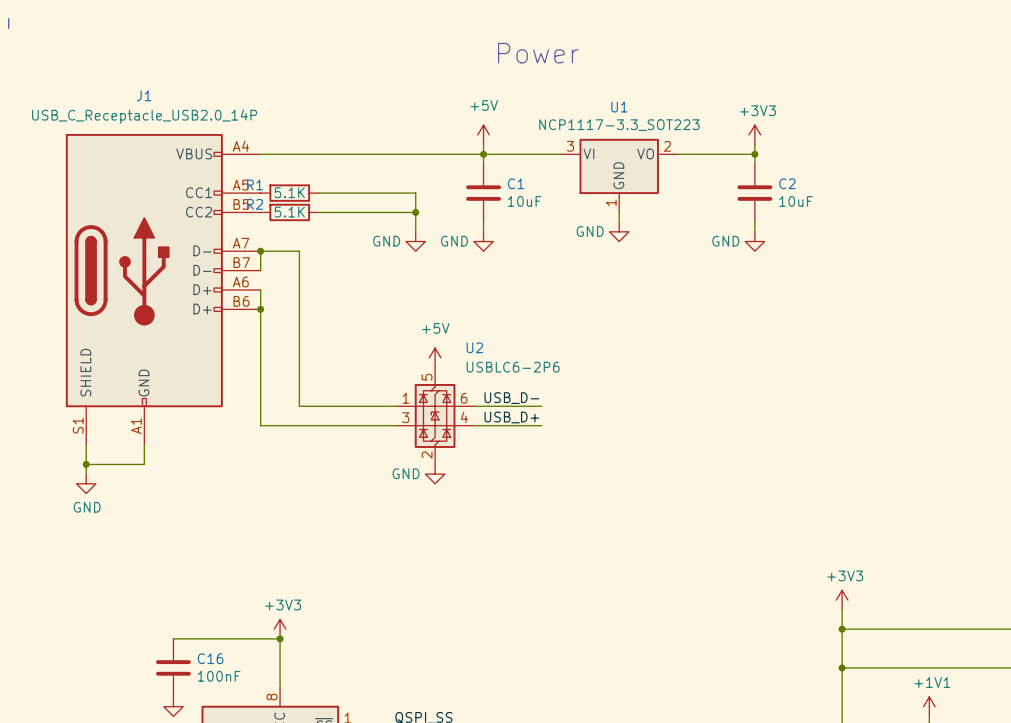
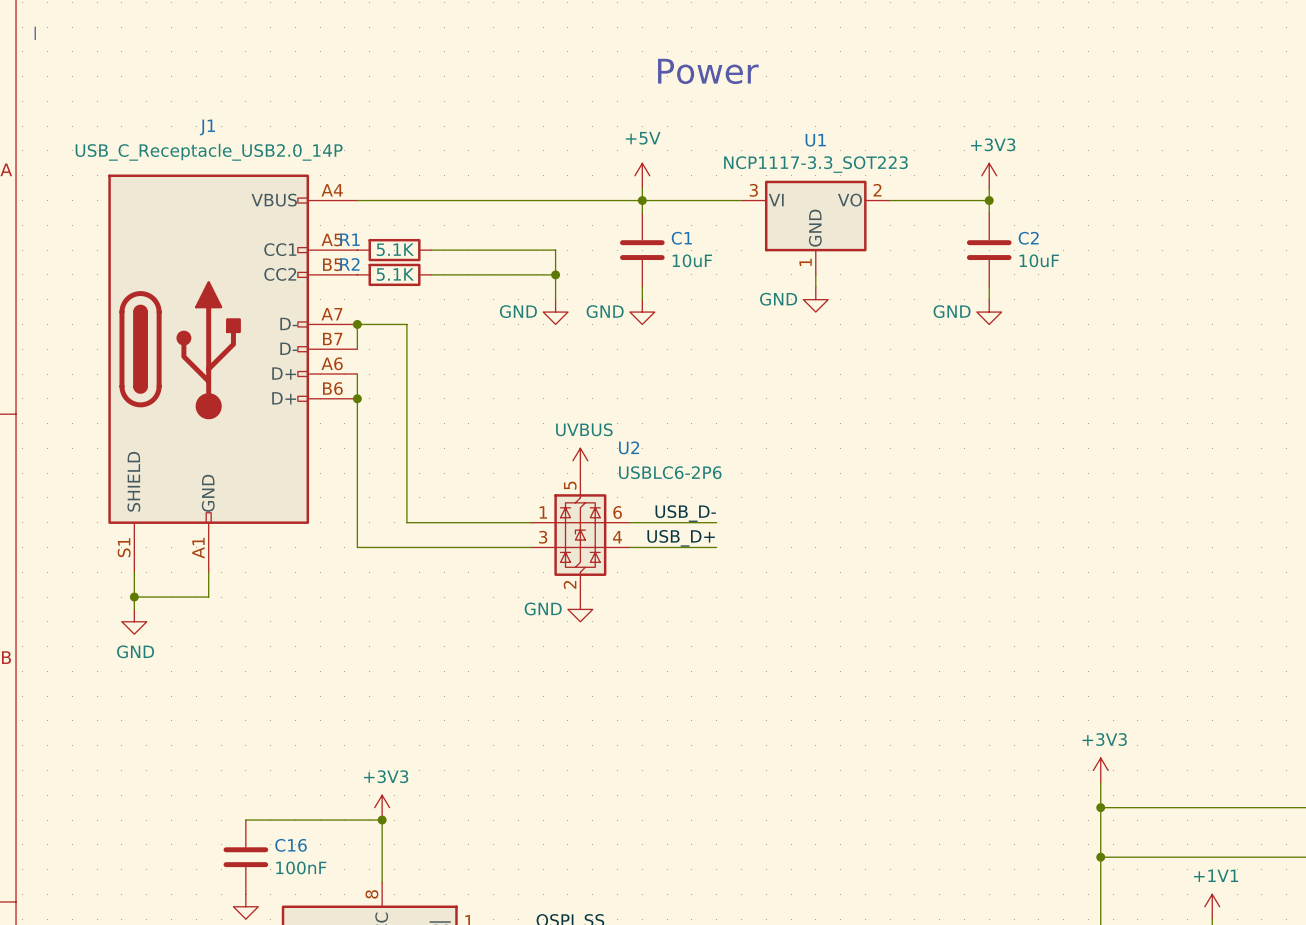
power symbol: +5V (435, 357) -> UVBUS (580, 460)

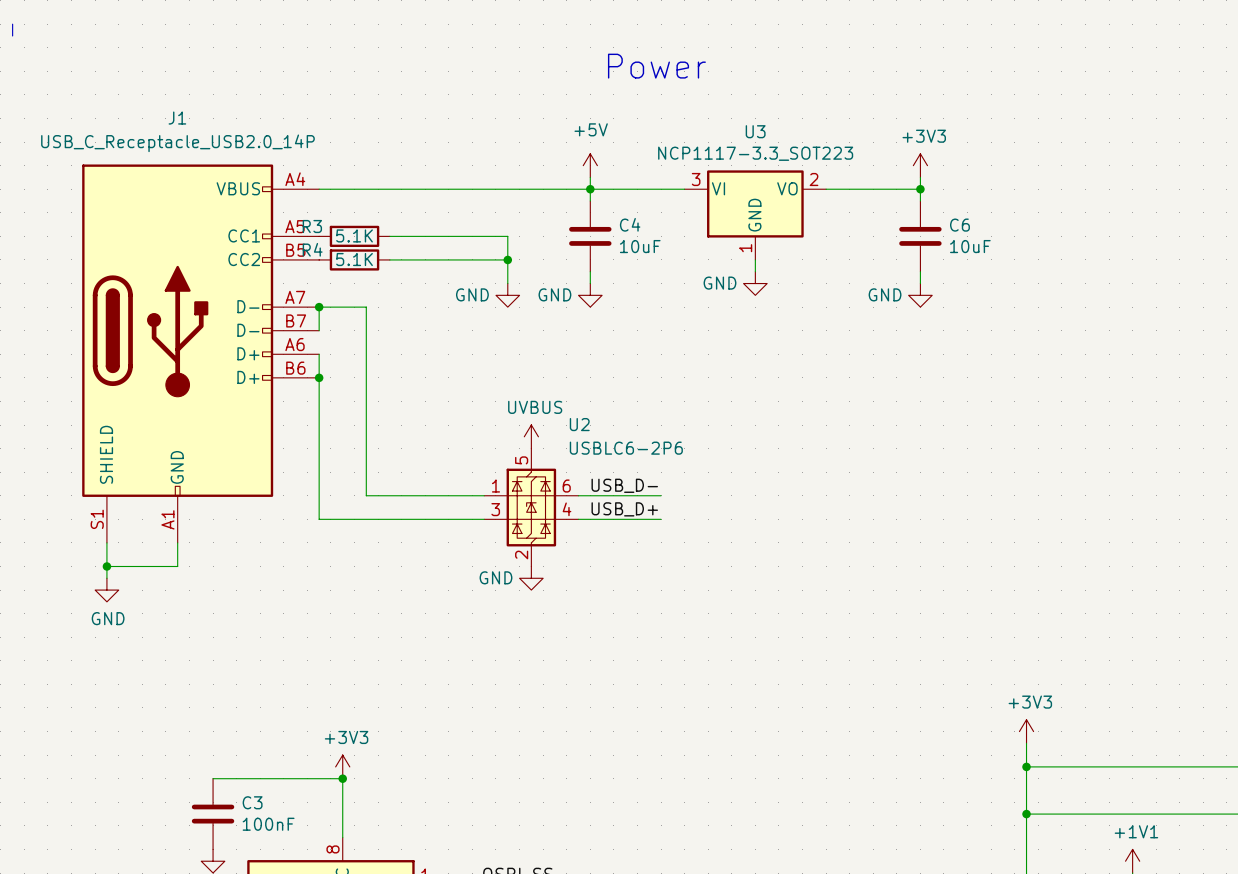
U1 name: U1 (815, 140) -> U3 (755, 131)
C1 name: C1 (681, 238) -> C4 (630, 224)
C2 name: C2 (1028, 238) -> C6 (959, 225)
R1 name: R1 (349, 239) -> R3 (312, 226)
R2 name: R2 (349, 264) -> R4 (312, 249)
C16 name: C16 (291, 845) -> C3 (252, 802)

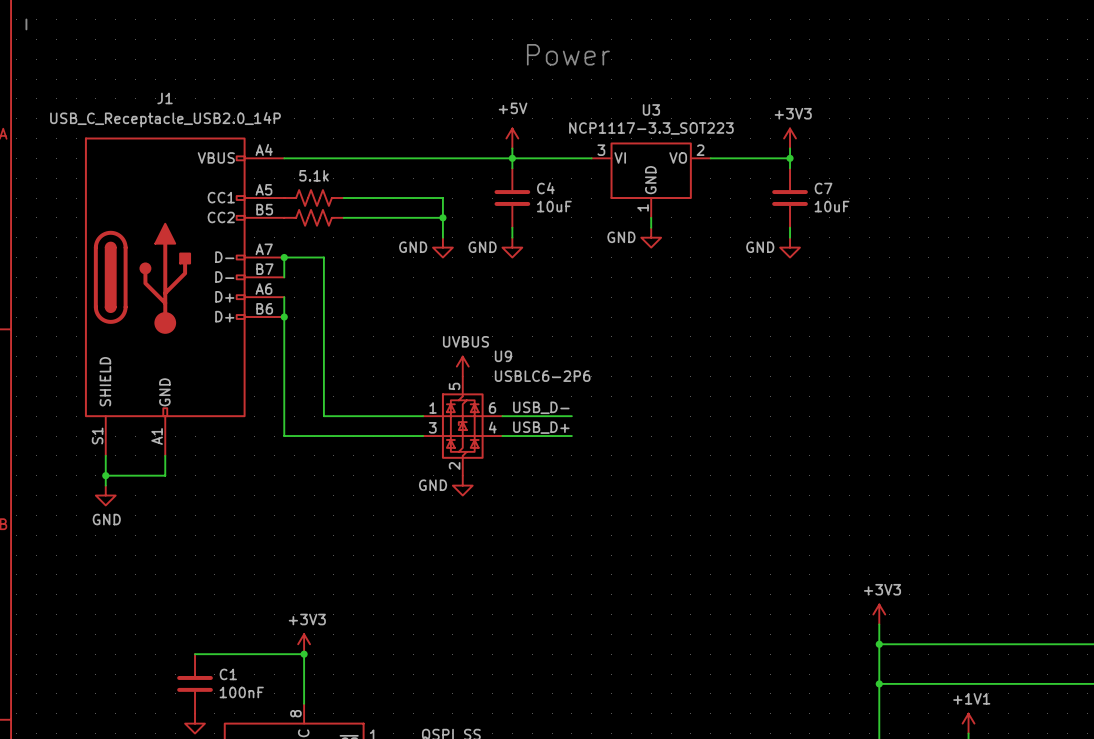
C6 name: C6 (959, 225) -> C7 (823, 188)
R3: 5.1K (354, 236) -> none
part: none -> 5.1k (314, 198)
R4: 5.1K (354, 259) -> none
part: none -> (314, 217)
U2 name: U2 (579, 424) -> U9 (503, 356)
C3 name: C3 (252, 802) -> C1 (228, 674)

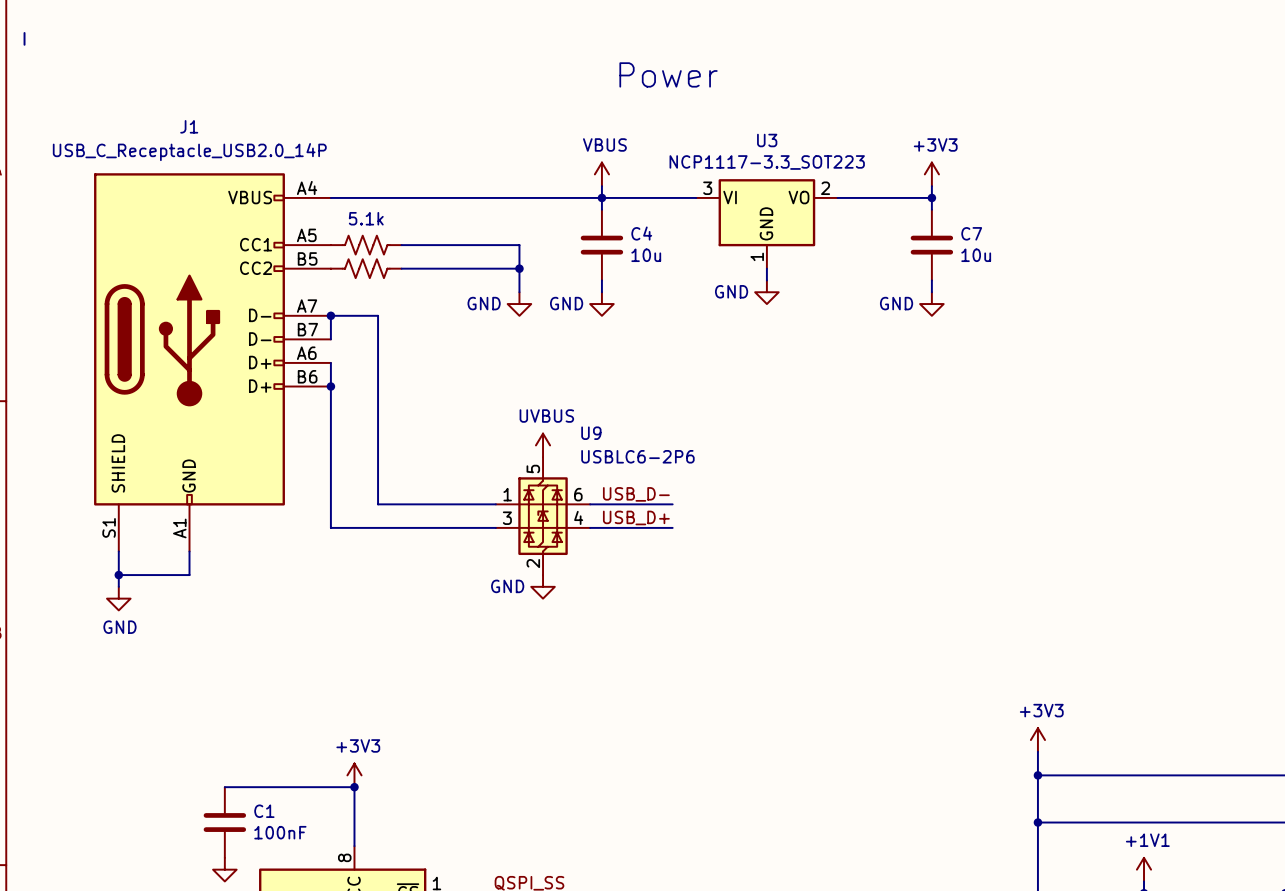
power symbol: +5V (512, 138) -> VBUS (601, 174)
C4 value: 10uF (554, 206) -> 10u (646, 255)
C7 value: 10uF (832, 206) -> 10u (976, 255)

